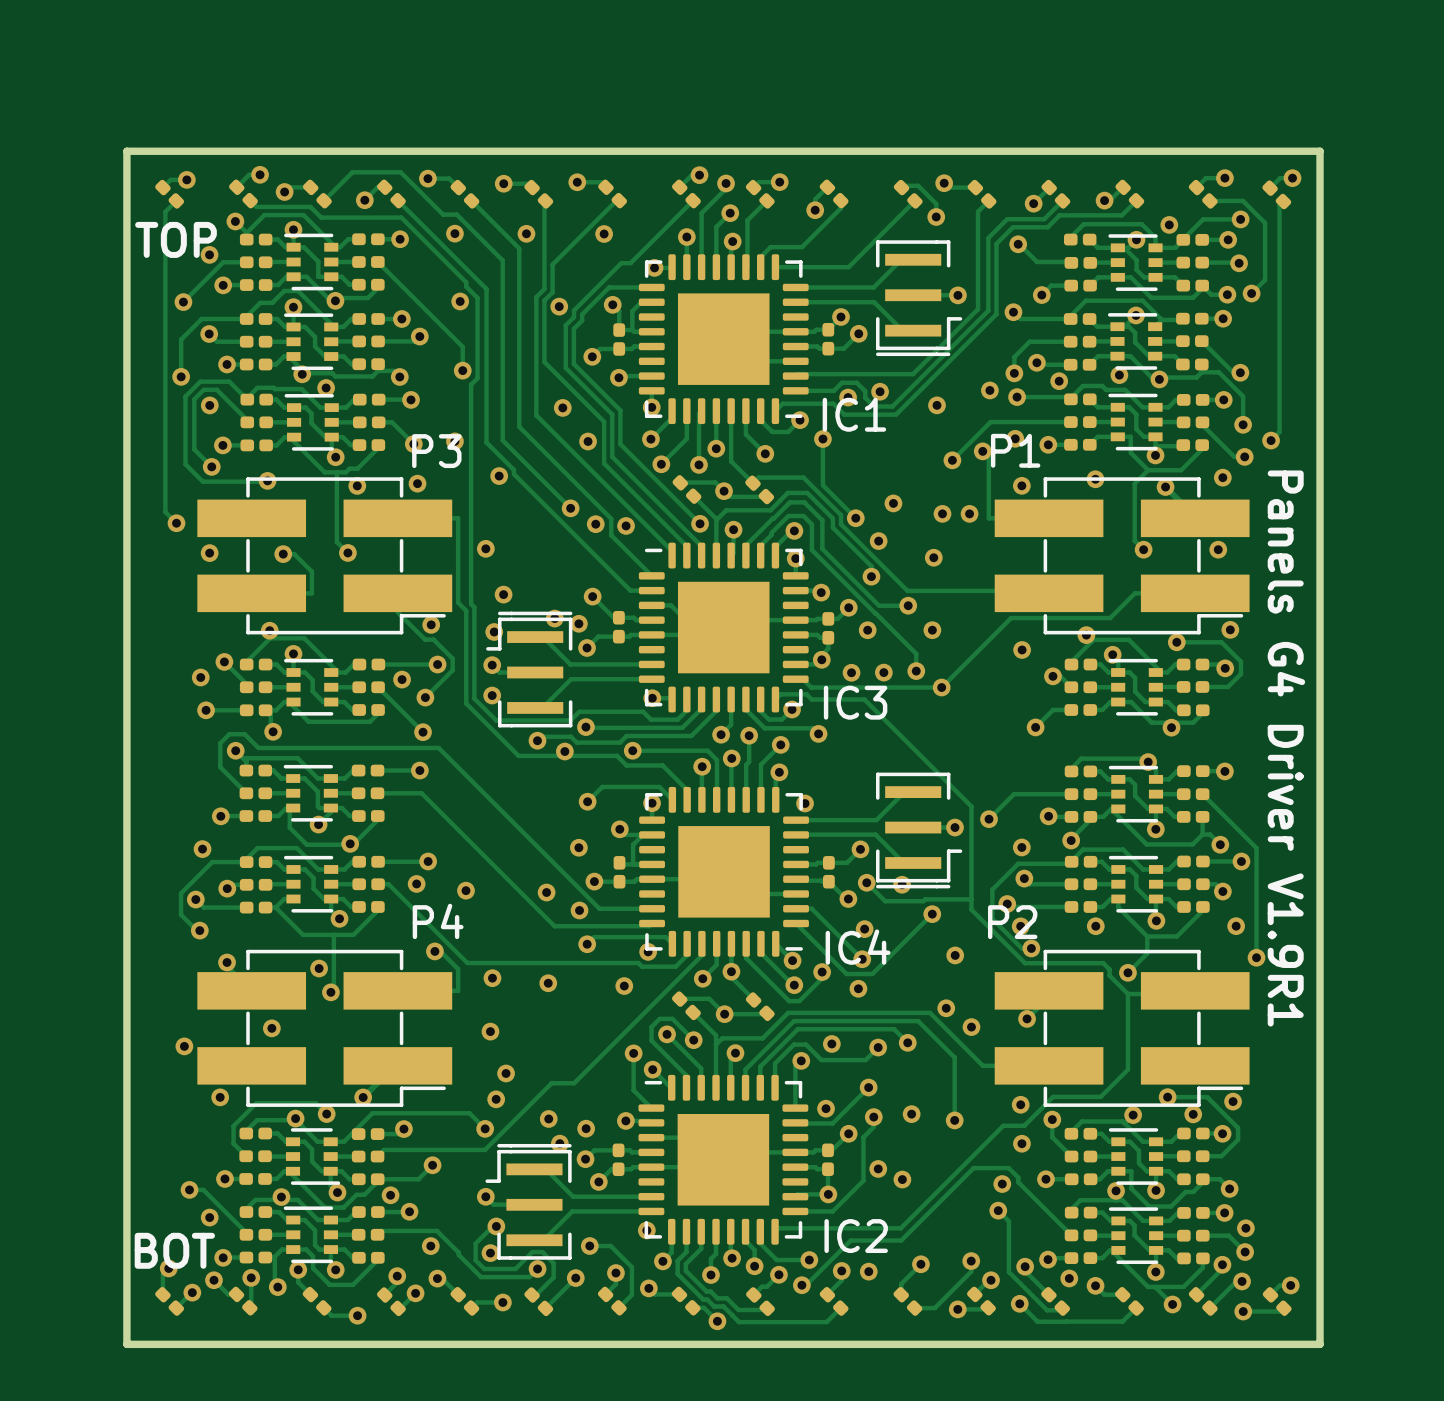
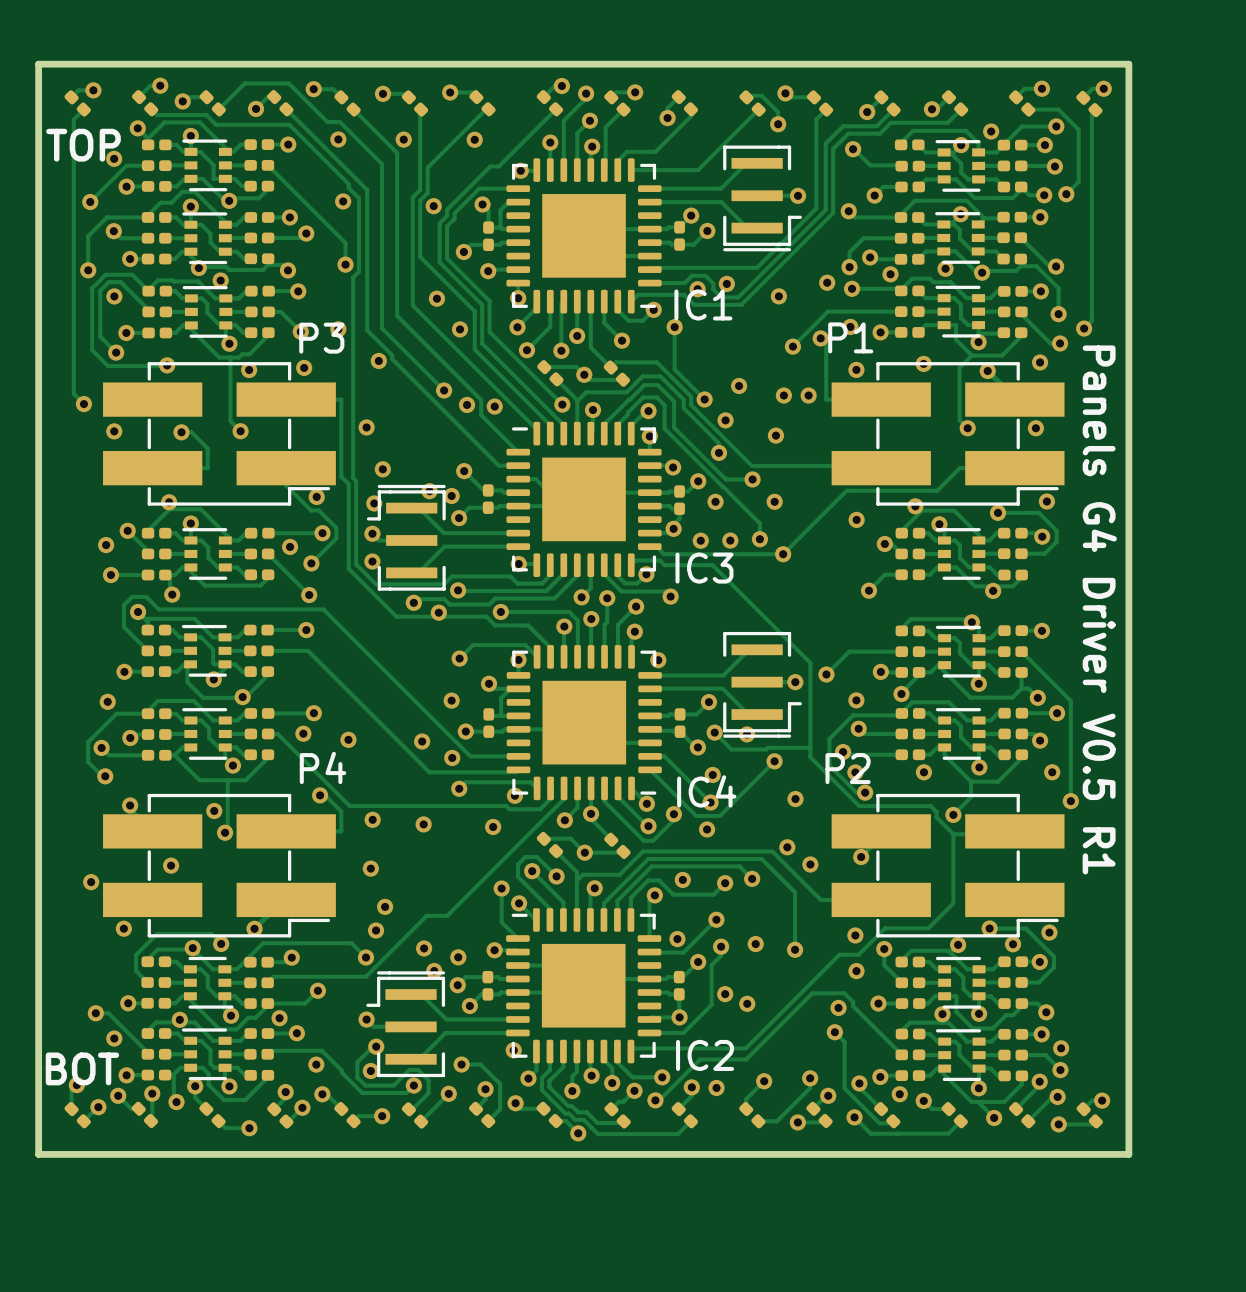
text: Panels G4 Driver V1.9R1 (1286, 748) -> Panels G4 Driver V0.5 R1 (1099, 609)

